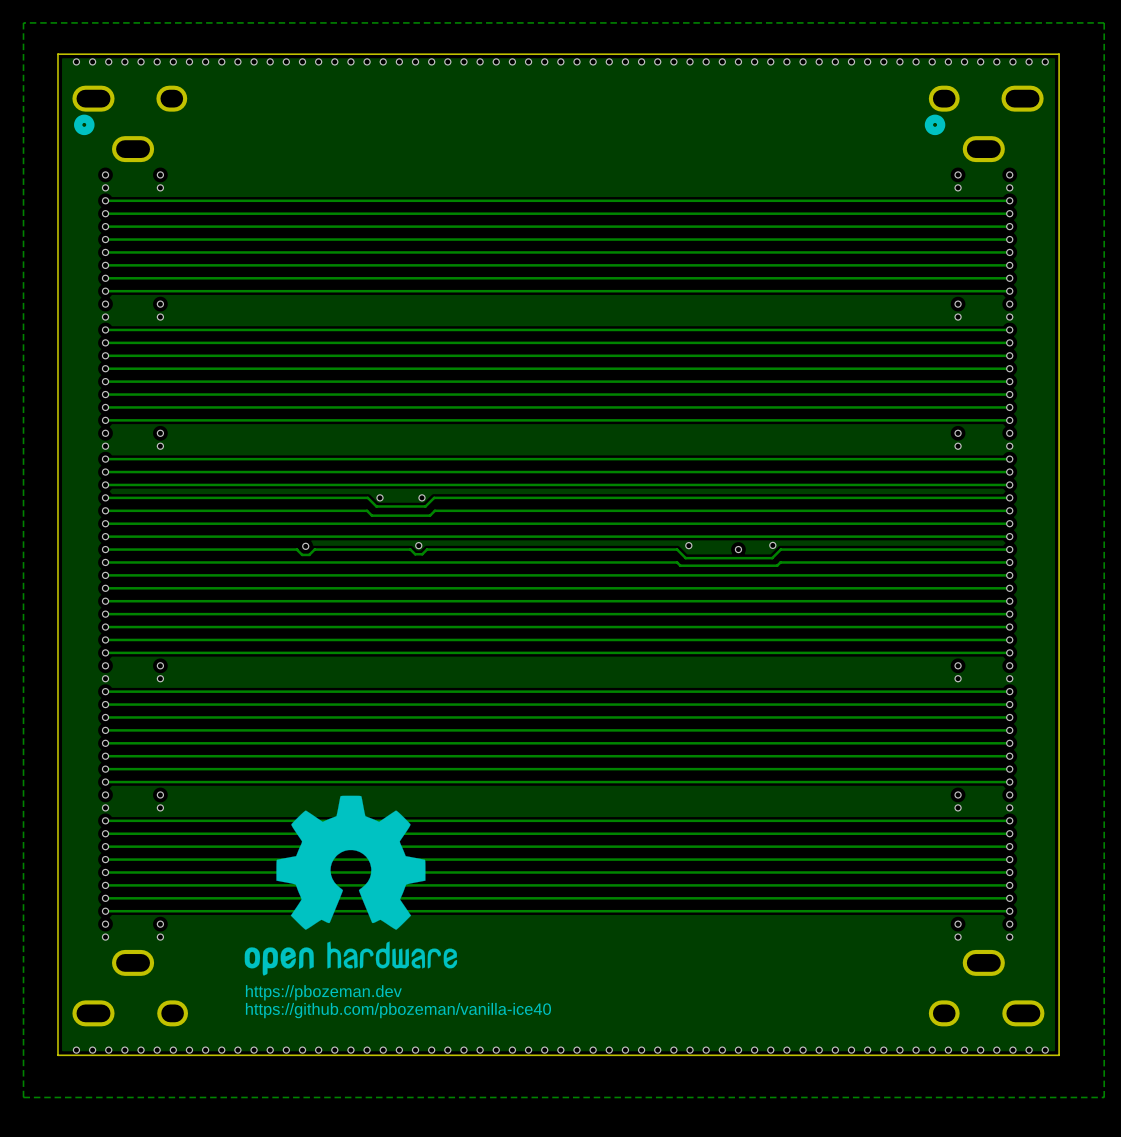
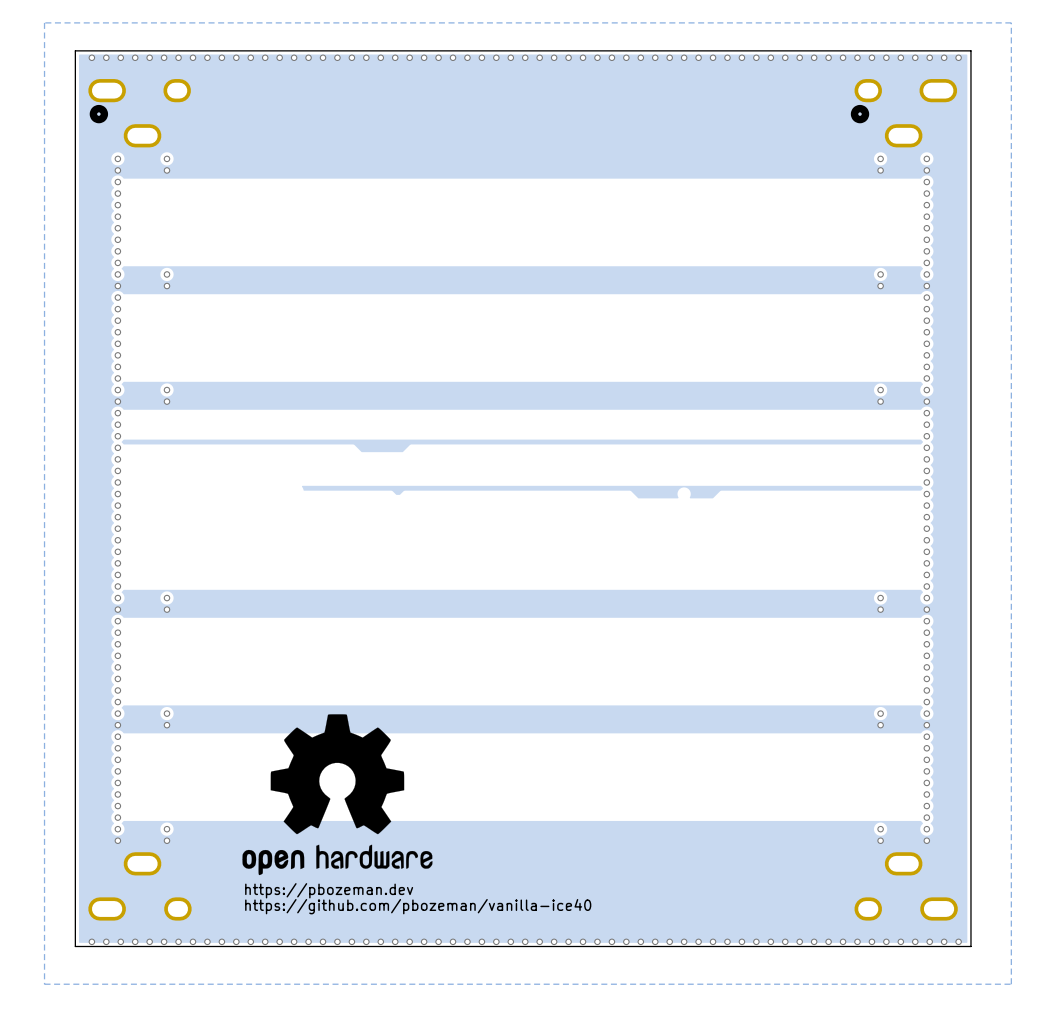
track: (1009, 200) (105, 200) -> none
track: (1009, 213) (105, 213) -> none
track: (1009, 226) (105, 226) -> none
track: (1009, 239) (105, 239) -> none
track: (1009, 252) (105, 252) -> none
track: (1009, 265) (105, 265) -> none
track: (1009, 278) (105, 278) -> none
track: (1009, 291) (105, 291) -> none
track: (1009, 329) (105, 329) -> none
track: (1009, 342) (105, 342) -> none
track: (1009, 355) (105, 355) -> none
track: (1009, 368) (105, 368) -> none
track: (1009, 381) (105, 381) -> none
track: (1009, 394) (105, 394) -> none
track: (1009, 407) (105, 407) -> none
track: (1009, 420) (105, 420) -> none
track: (1009, 459) (105, 459) -> none
track: (1009, 472) (105, 472) -> none
track: (1009, 484) (105, 484) -> none
via: (380, 497) -> none
via: (421, 497) -> none
track: (1009, 497) (434, 497) (425, 506) (376, 506) (367, 497) (105, 497) -> none
track: (1009, 510) (434, 510) (430, 515) (371, 515) (367, 510) (105, 510) -> none
track: (1009, 523) (105, 523) -> none
track: (1009, 536) (105, 536) -> none
via: (418, 545) -> none
via: (688, 545) -> none
via: (772, 545) -> none
via: (305, 546) -> none
via: (738, 549) -> none
track: (1009, 549) (780, 549) (772, 558) (685, 558) (677, 549) (427, 549) (422, 554) (415, 554) (410, 549) (314, 549) (309, 554) (302, 554) (297, 549) (105, 549) -> none
track: (1009, 562) (780, 562) (777, 565) (680, 565) (677, 562) (105, 562) -> none
track: (1009, 575) (105, 575) -> none
track: (1009, 588) (105, 588) -> none
track: (1009, 601) (105, 601) -> none
track: (1009, 614) (105, 614) -> none
track: (1009, 627) (105, 627) -> none
track: (1009, 639) (105, 639) -> none
track: (1009, 652) (105, 652) -> none
track: (1009, 691) (105, 691) -> none
track: (1009, 704) (105, 704) -> none
track: (1009, 717) (105, 717) -> none
track: (1009, 730) (105, 730) -> none
track: (1009, 743) (105, 743) -> none
track: (1009, 756) (105, 756) -> none
track: (1009, 769) (105, 769) -> none
track: (1009, 782) (105, 782) -> none
track: (1009, 820) (105, 820) -> none
track: (1009, 833) (105, 833) -> none
track: (1009, 846) (105, 846) -> none
track: (1009, 859) (105, 859) -> none
track: (1009, 872) (105, 872) -> none
track: (1009, 885) (105, 885) -> none
track: (1009, 898) (105, 898) -> none
track: (1009, 911) (105, 911) -> none

